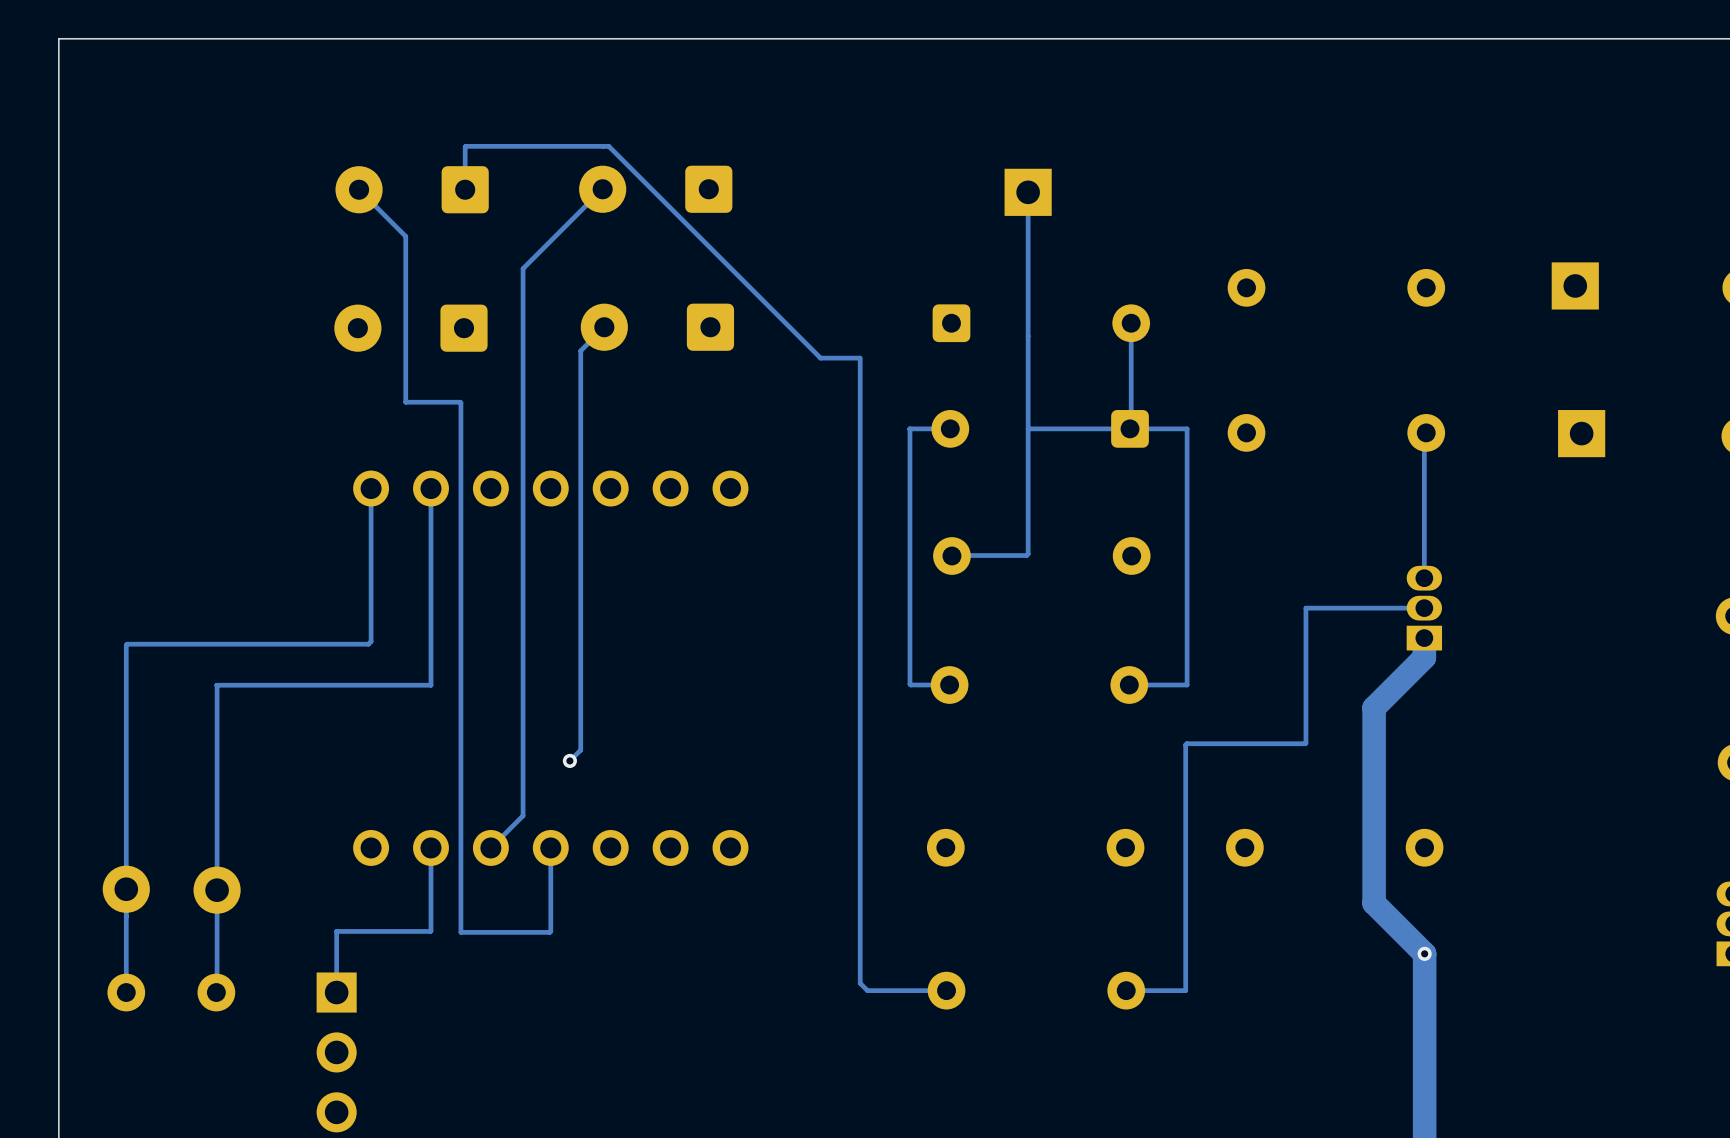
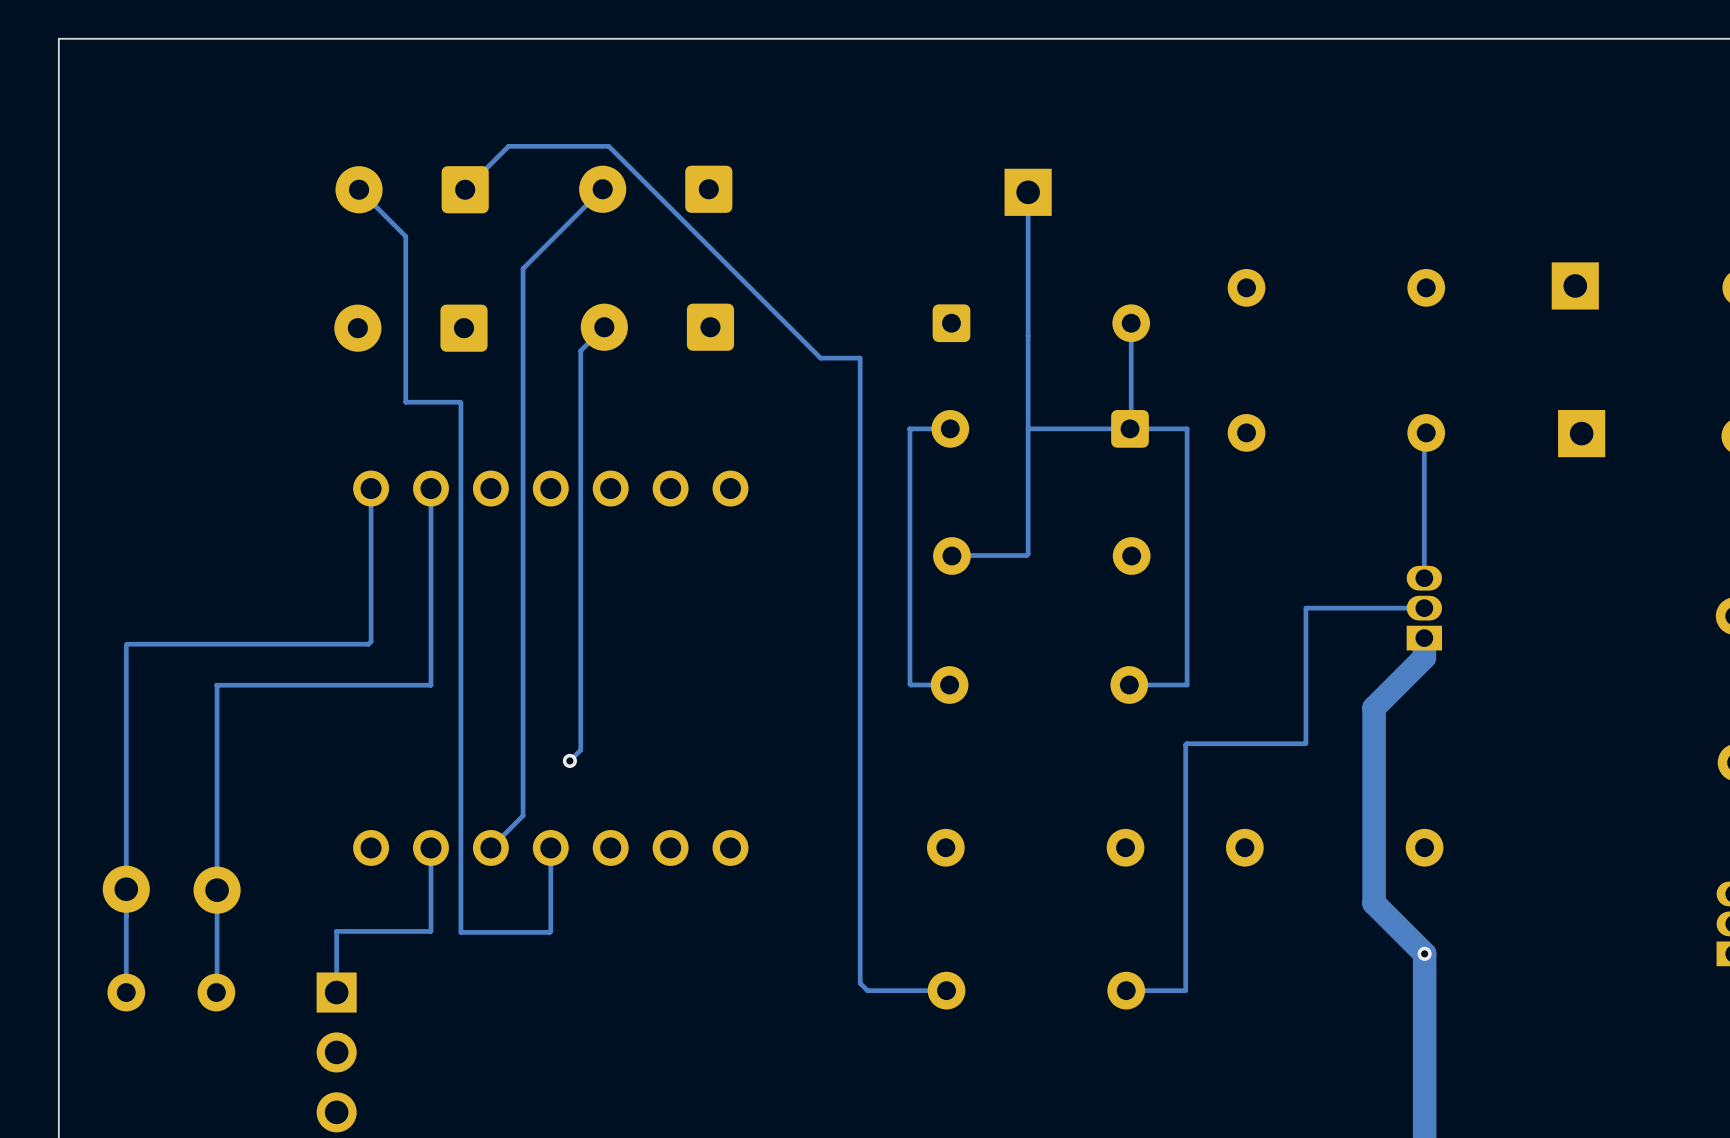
track: (508, 146) (465, 146) (465, 189) -> (508, 146) (465, 189)

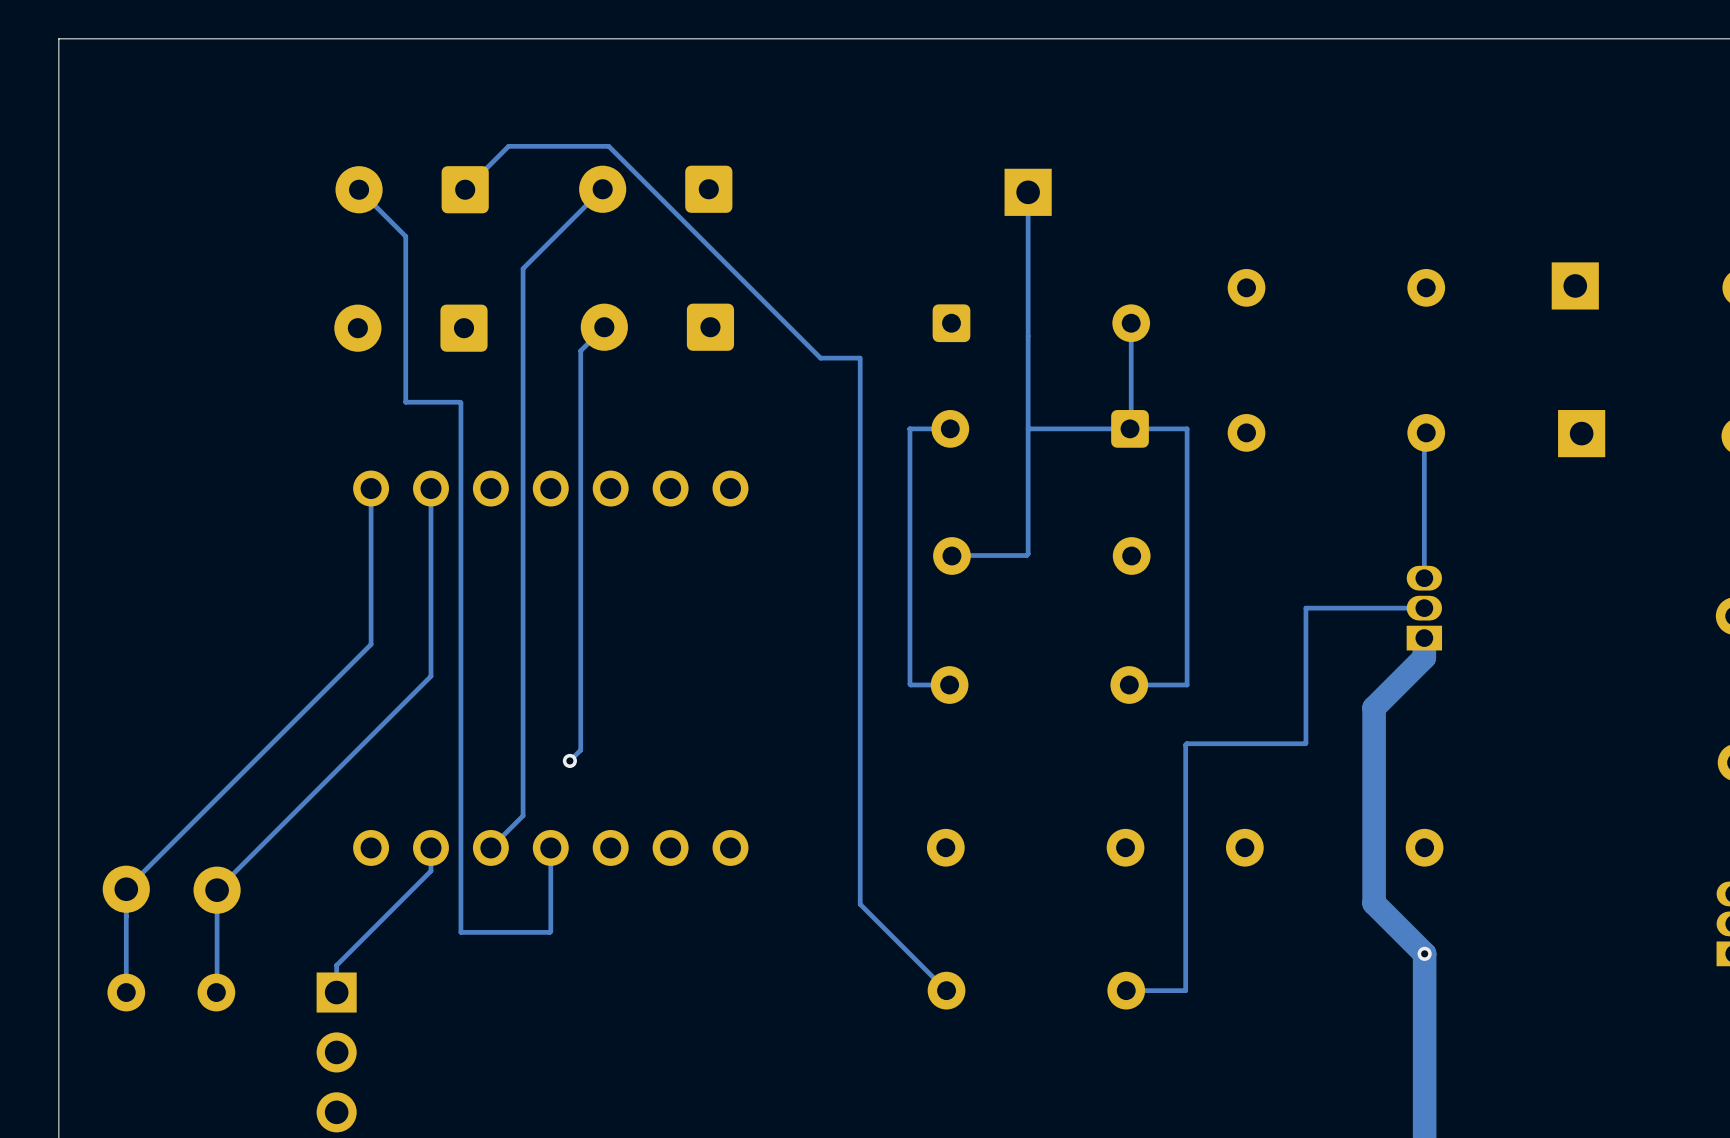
track: (371, 641) (368, 644) (126, 645) (126, 889) -> (371, 641) (371, 644) (126, 889)
track: (430, 676) (430, 685) (216, 685) -> (430, 676) (217, 890)
track: (217, 685) (217, 890) -> none
track: (430, 871) (430, 930) (336, 931) (336, 965) -> (430, 871) (336, 965)
track: (860, 904) (860, 983) (867, 990) (946, 990) -> (860, 904) (946, 990)

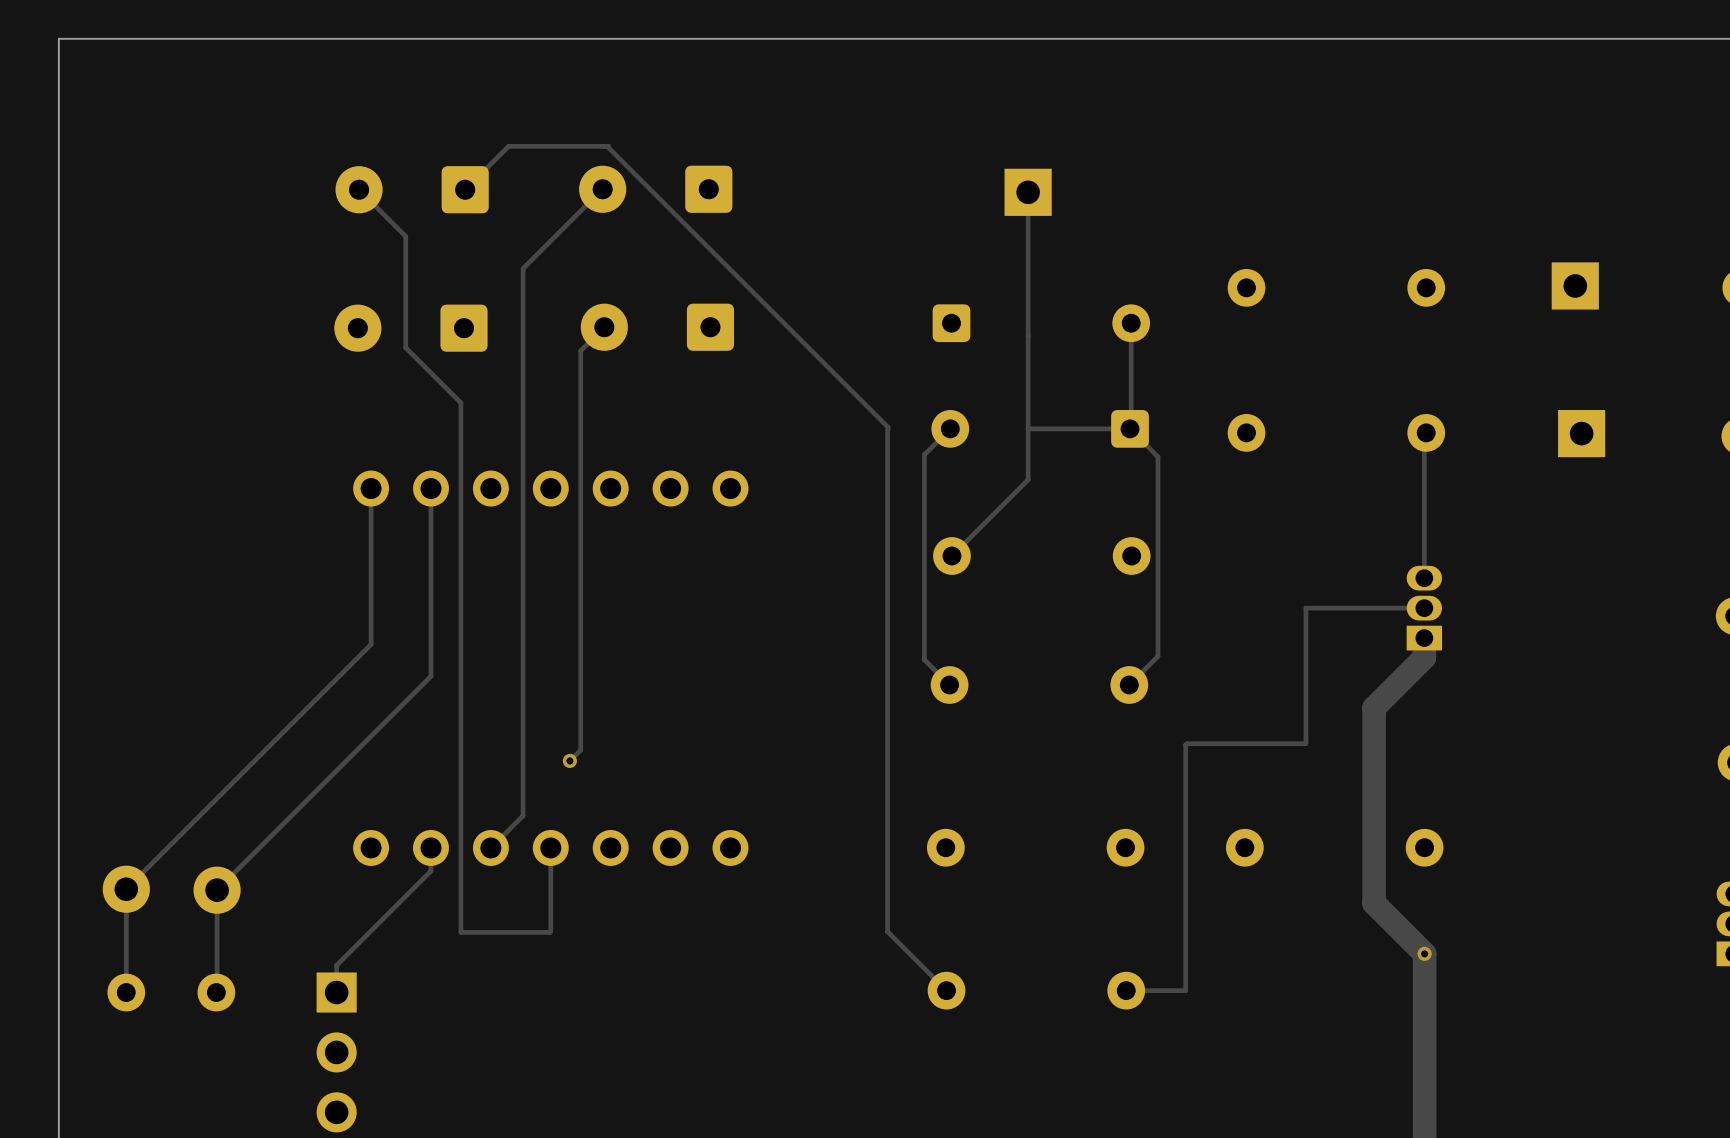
track: none -> (604, 146) (607, 146) (888, 427) (888, 430)
track: (609, 146) (820, 358) (859, 358) -> none
track: (405, 347) (405, 402) (460, 402) -> (405, 347) (460, 402)
track: (860, 358) (860, 904) (887, 931) -> (887, 430) (887, 931)
track: (950, 428) (909, 428) -> none
track: (1130, 428) (1187, 428) (1187, 685) (1129, 685) -> (1130, 428) (1157, 456) (1157, 656) (1129, 685)
track: (909, 429) (909, 684) (949, 685) -> (950, 428) (924, 454) (924, 659) (949, 685)
track: (1028, 479) (1026, 555) (952, 555) -> (1028, 479) (952, 555)

